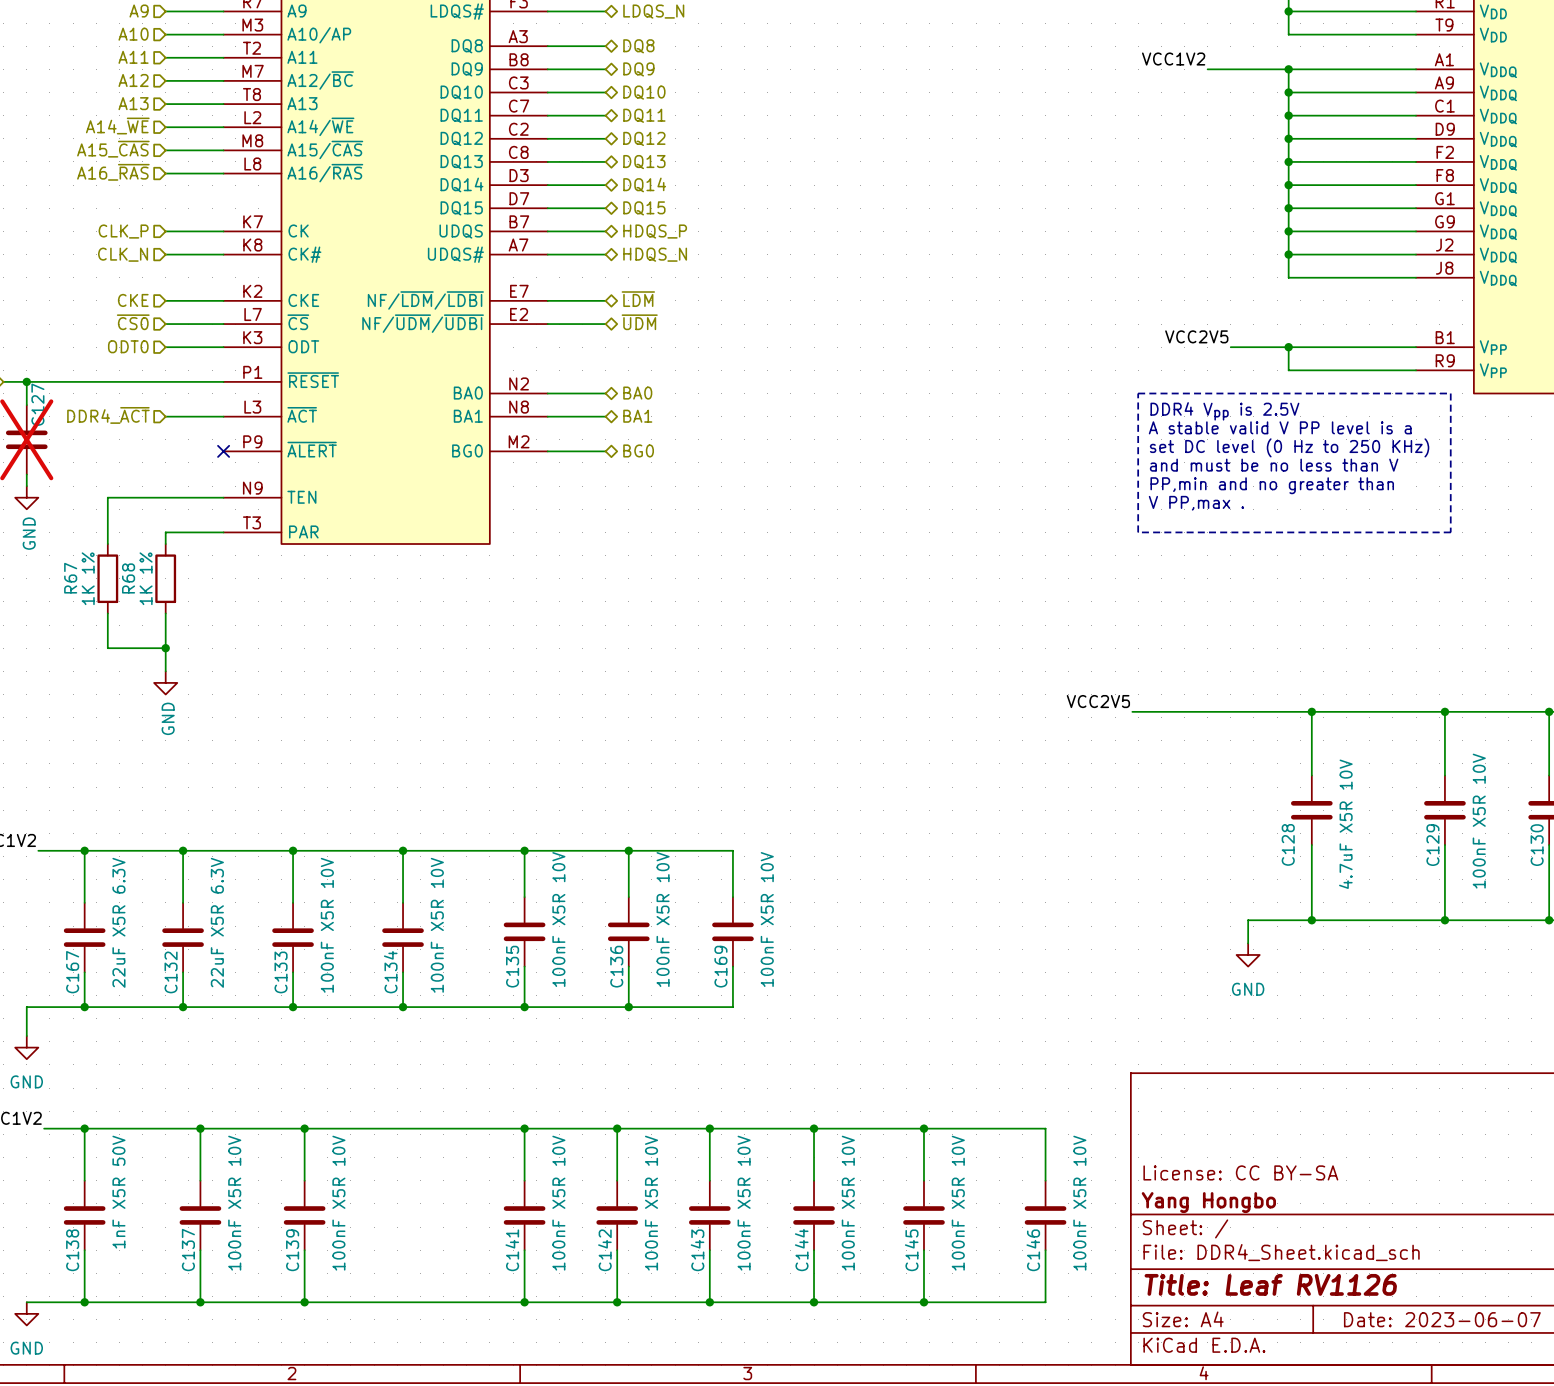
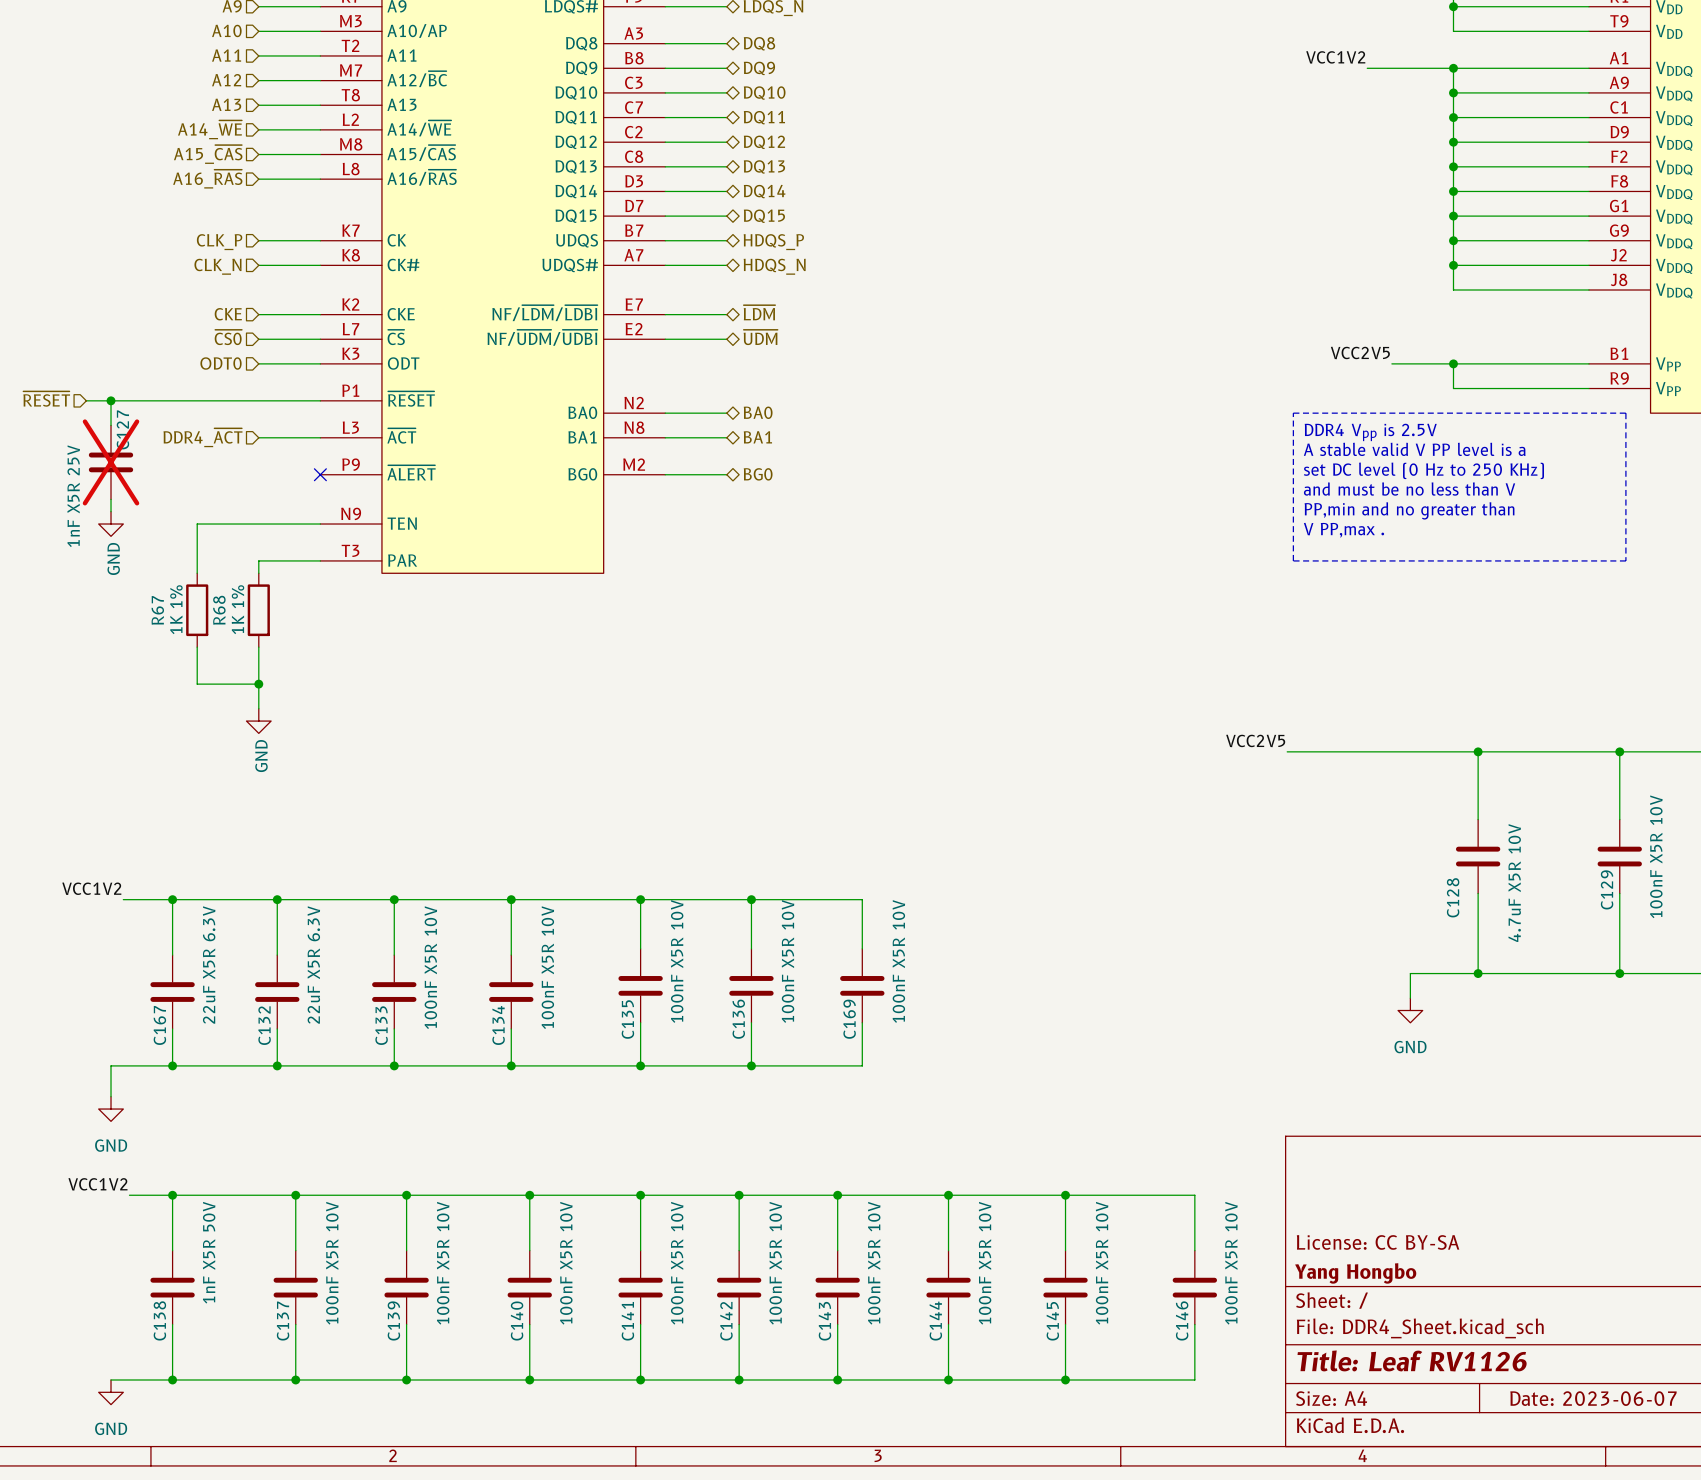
wire: none -> (529, 1195) (529, 1250)
junction: none -> (529, 1195)
C140: none -> 100nF X5R 10V (529, 1287)
wire: none -> (529, 1324) (529, 1379)
junction: none -> (529, 1379)

